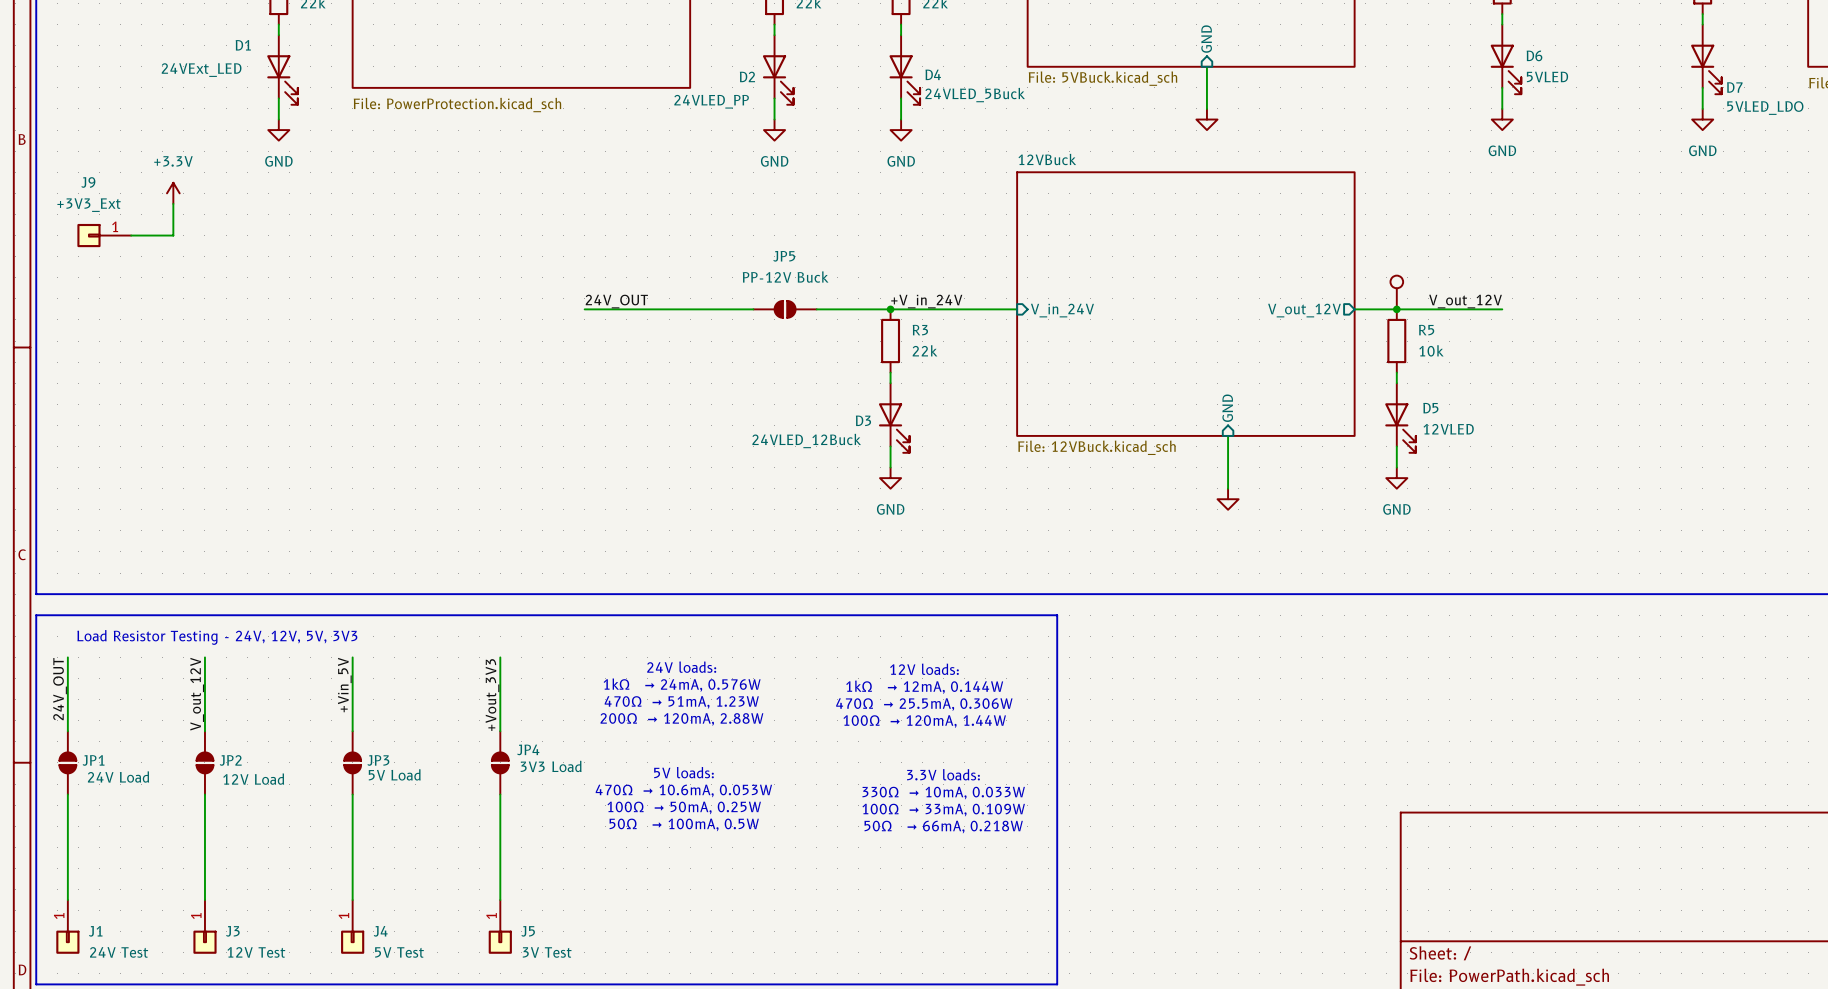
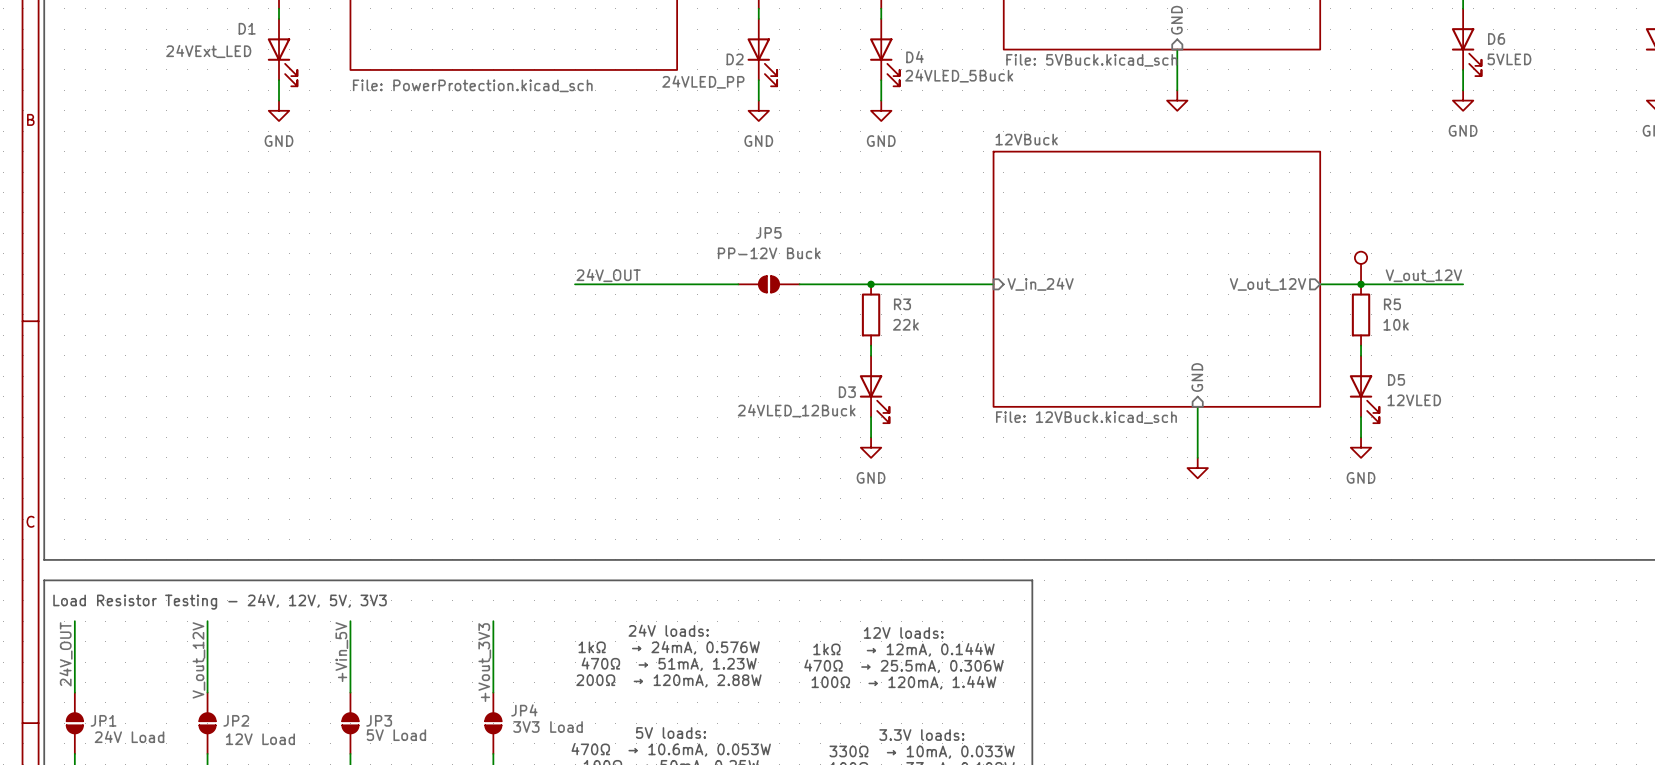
power symbol: +3.3V (173, 193) -> none
wire: (173, 203) (173, 235) (131, 235) -> none
J9: +3V3_Ext (104, 235) -> none
label: +V_in_24V (926, 301) -> none

